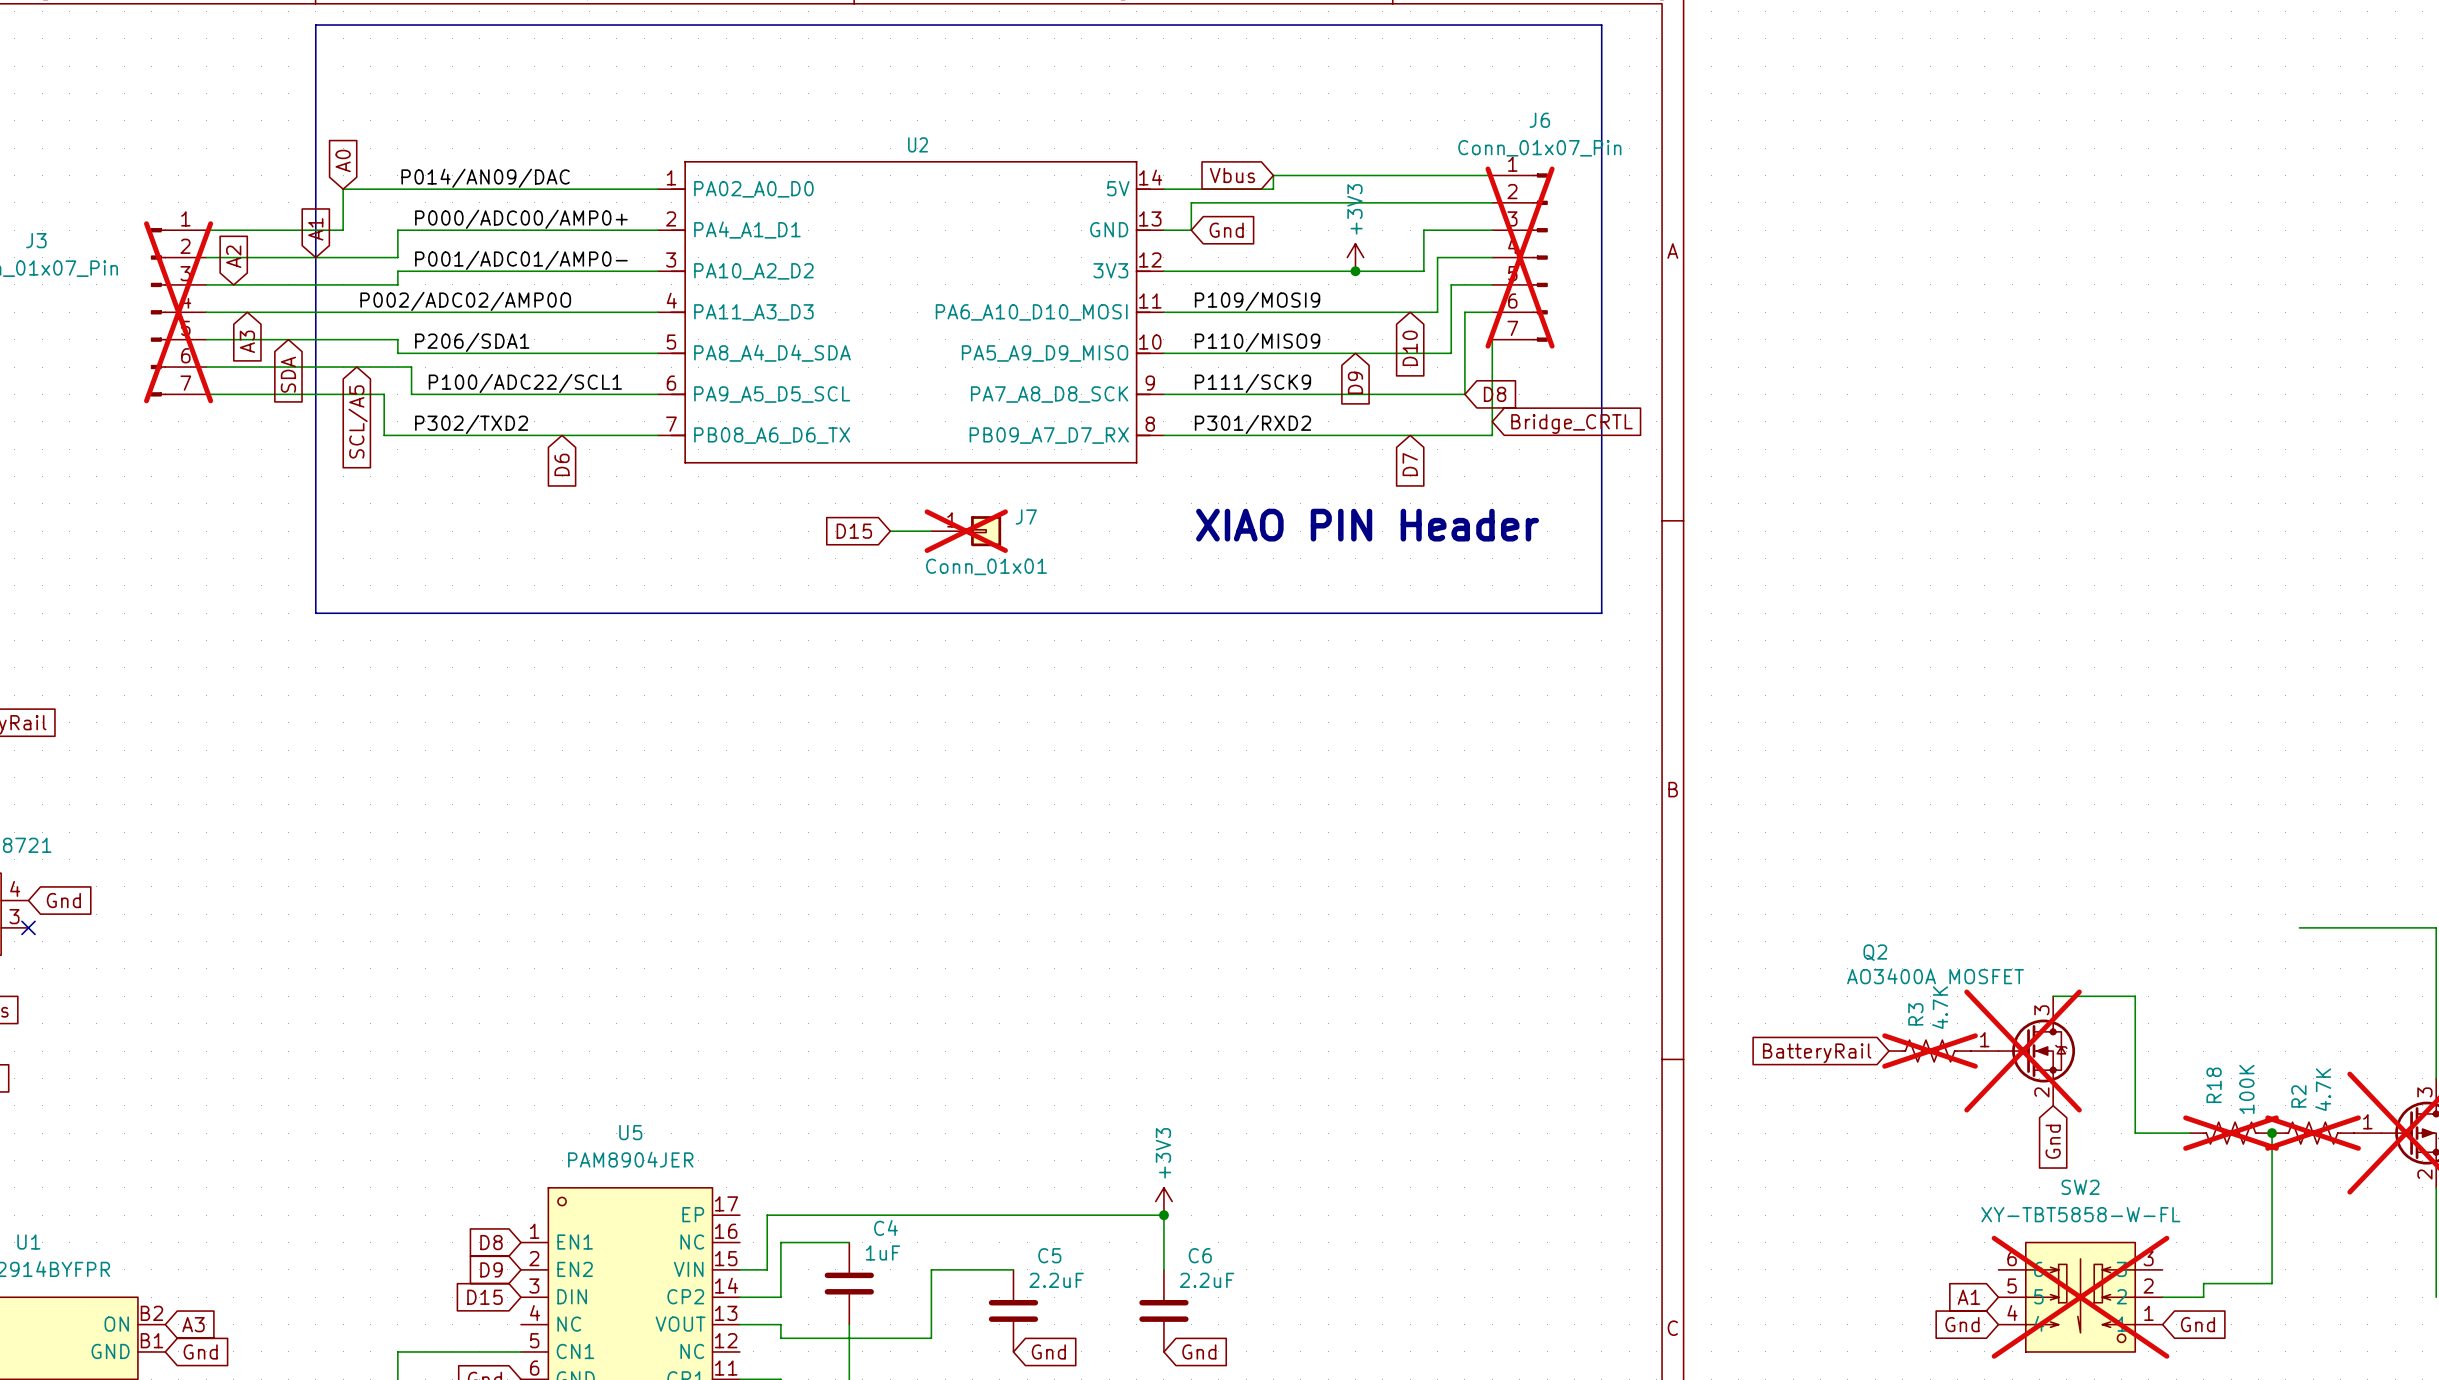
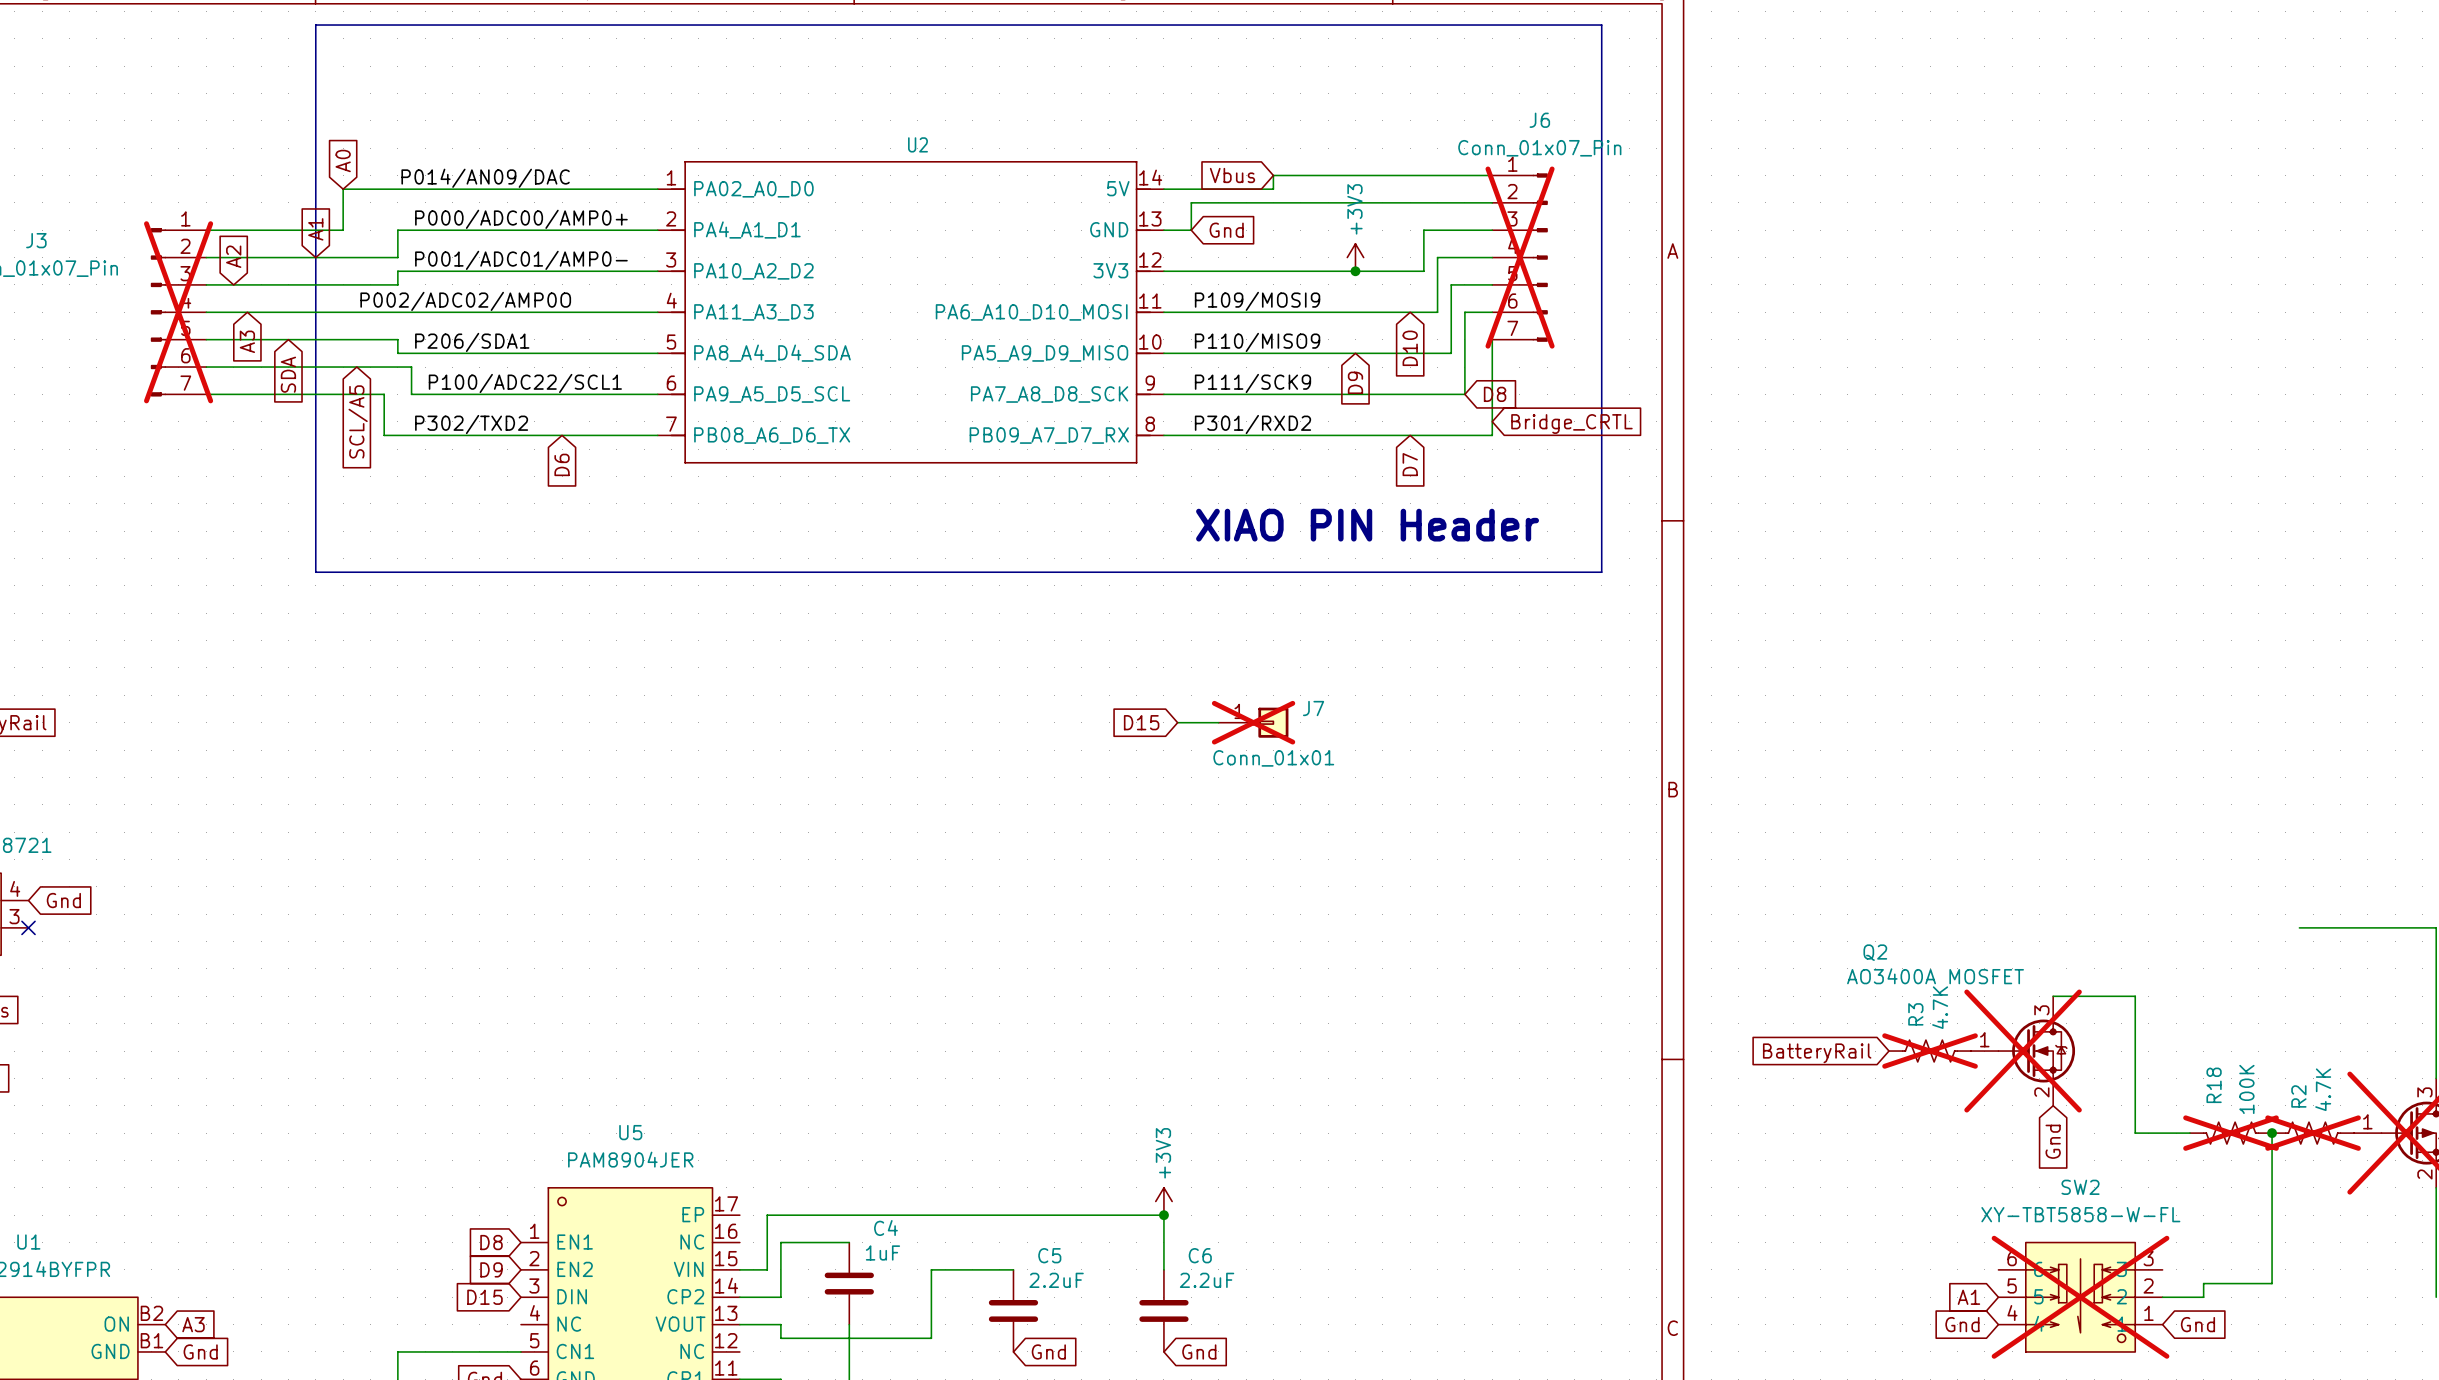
global label: D15 (854, 531) -> none
wire: (890, 531) (931, 531) -> none
J7 position: (966, 531) -> (1253, 722)
line: (315, 572) (315, 613) (1601, 613) (1601, 572) -> (315, 572) (1601, 572)
global label: none -> D15 (1141, 722)
wire: none -> (1177, 722) (1218, 722)

